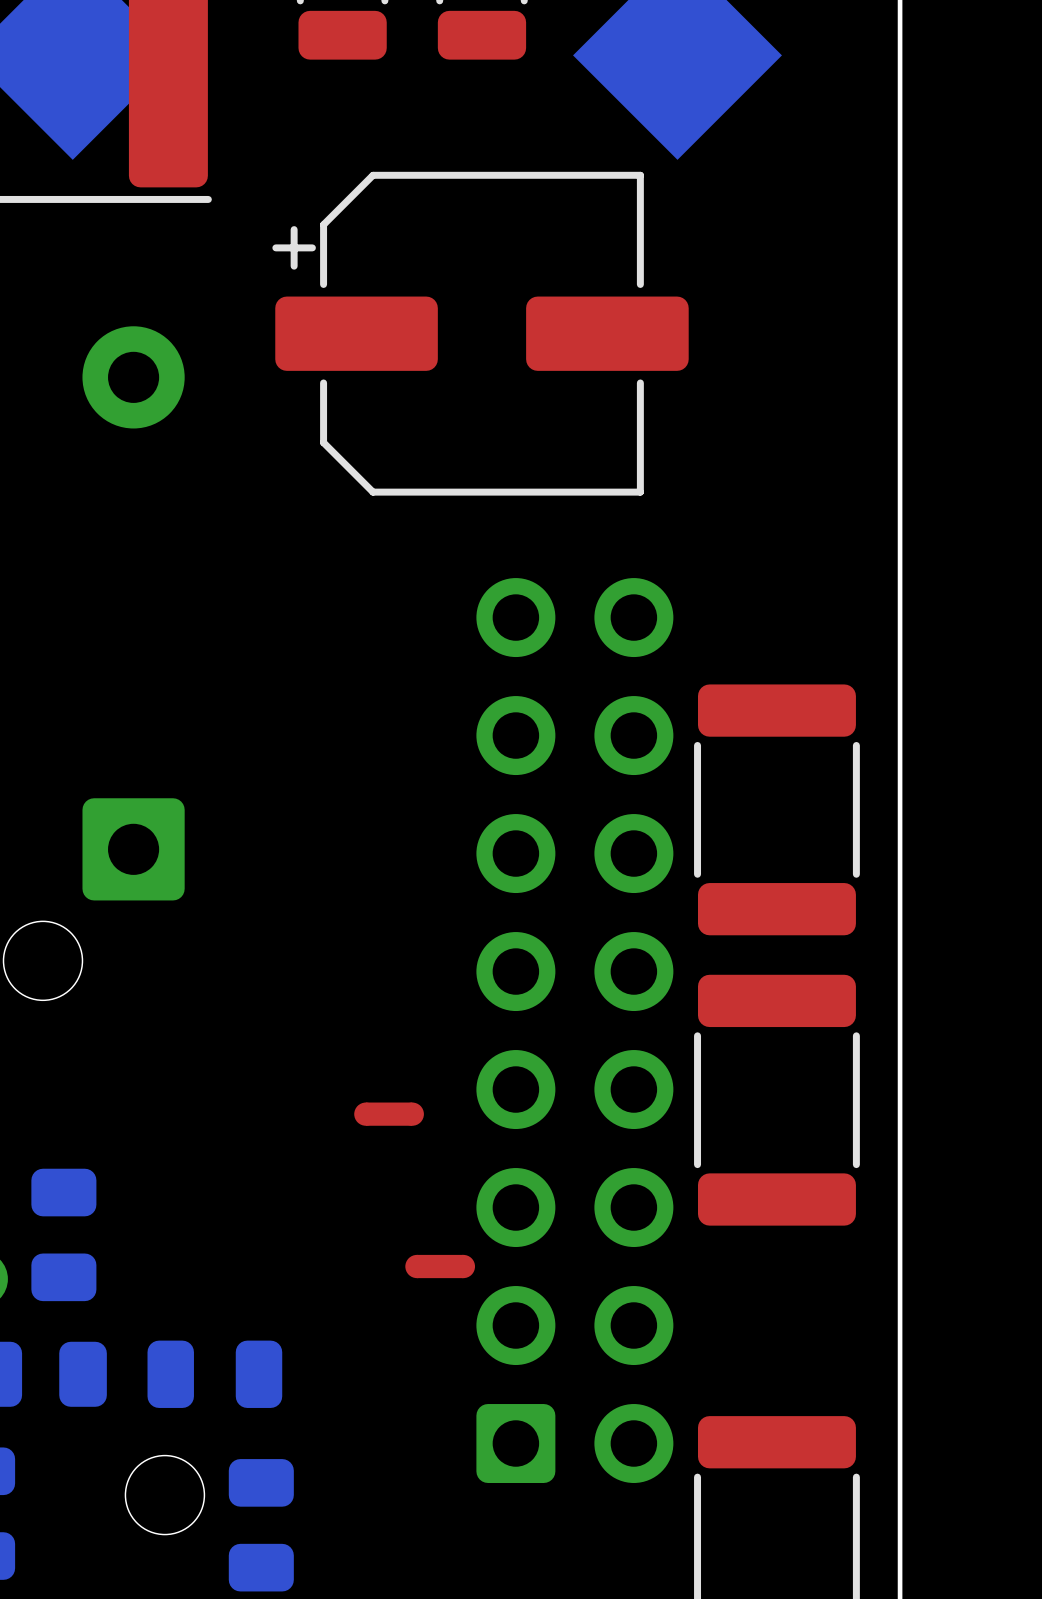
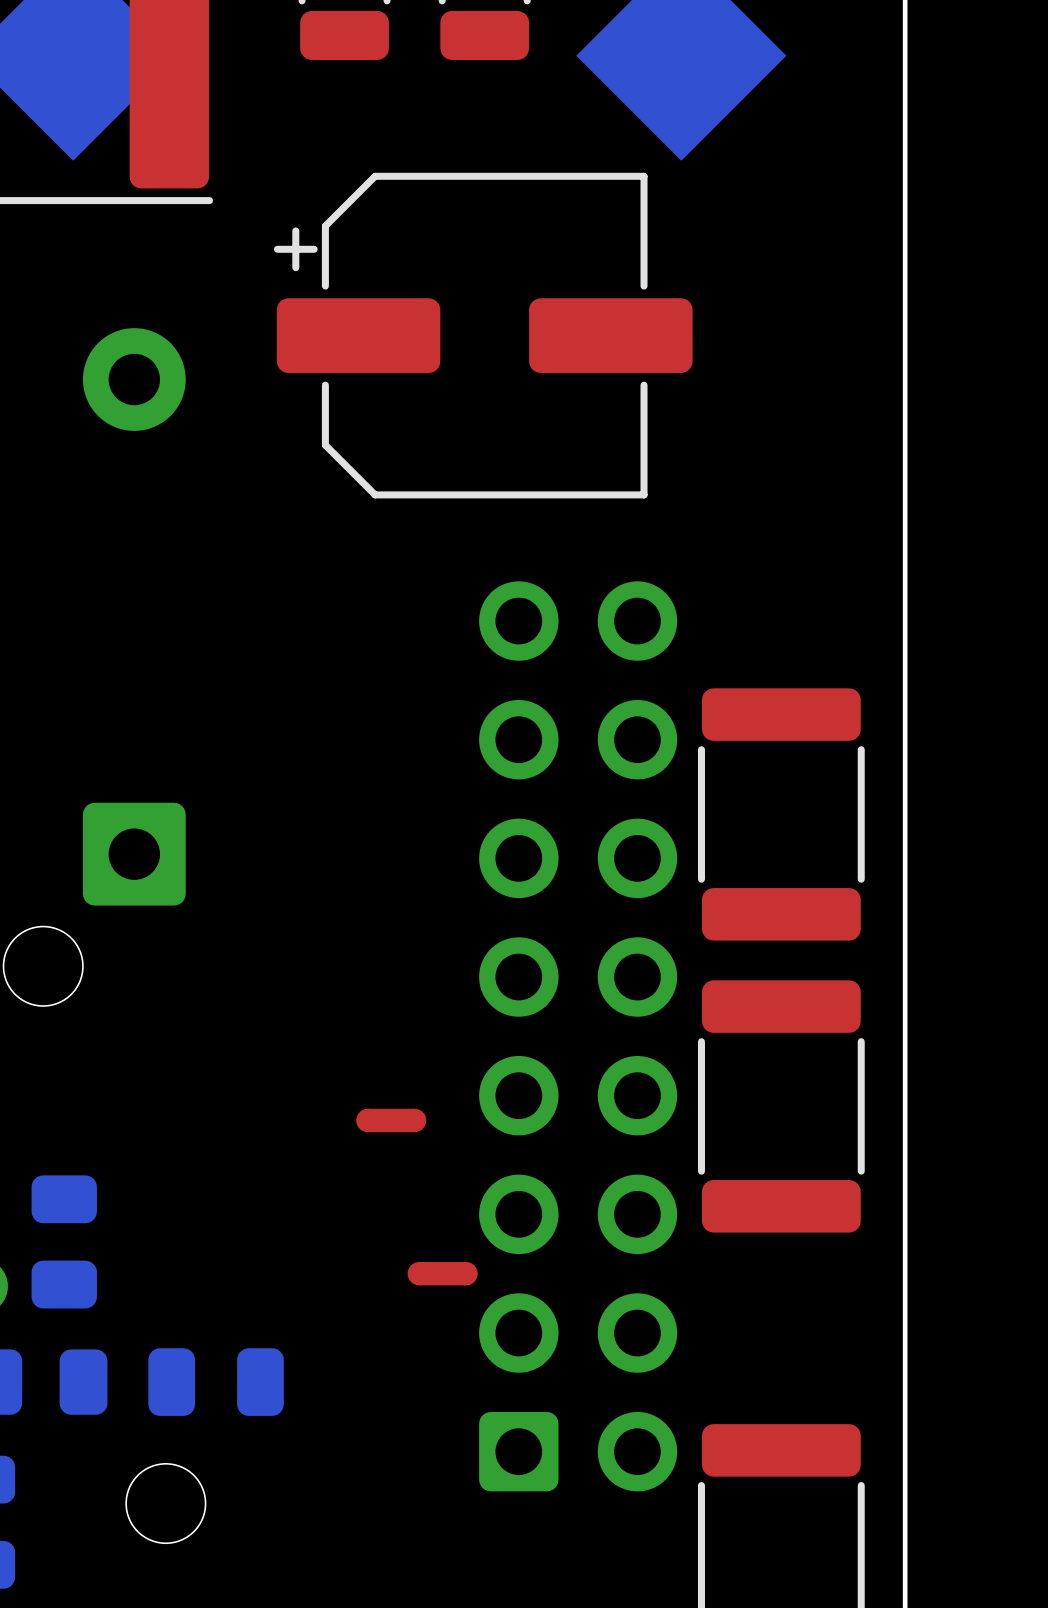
part: (261, 1525) -> none

